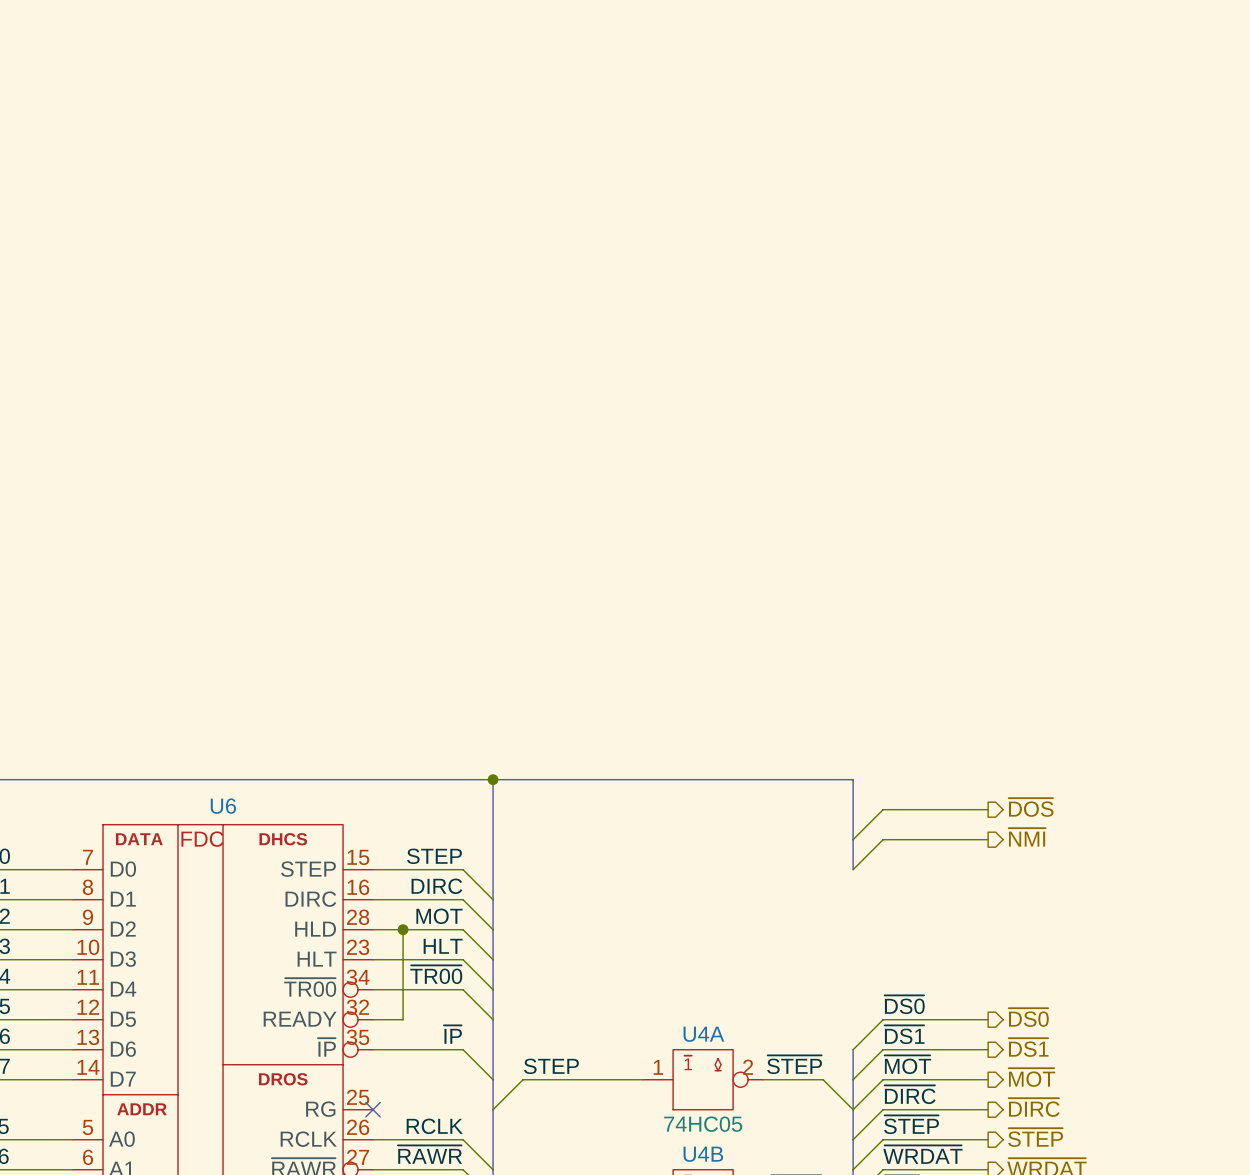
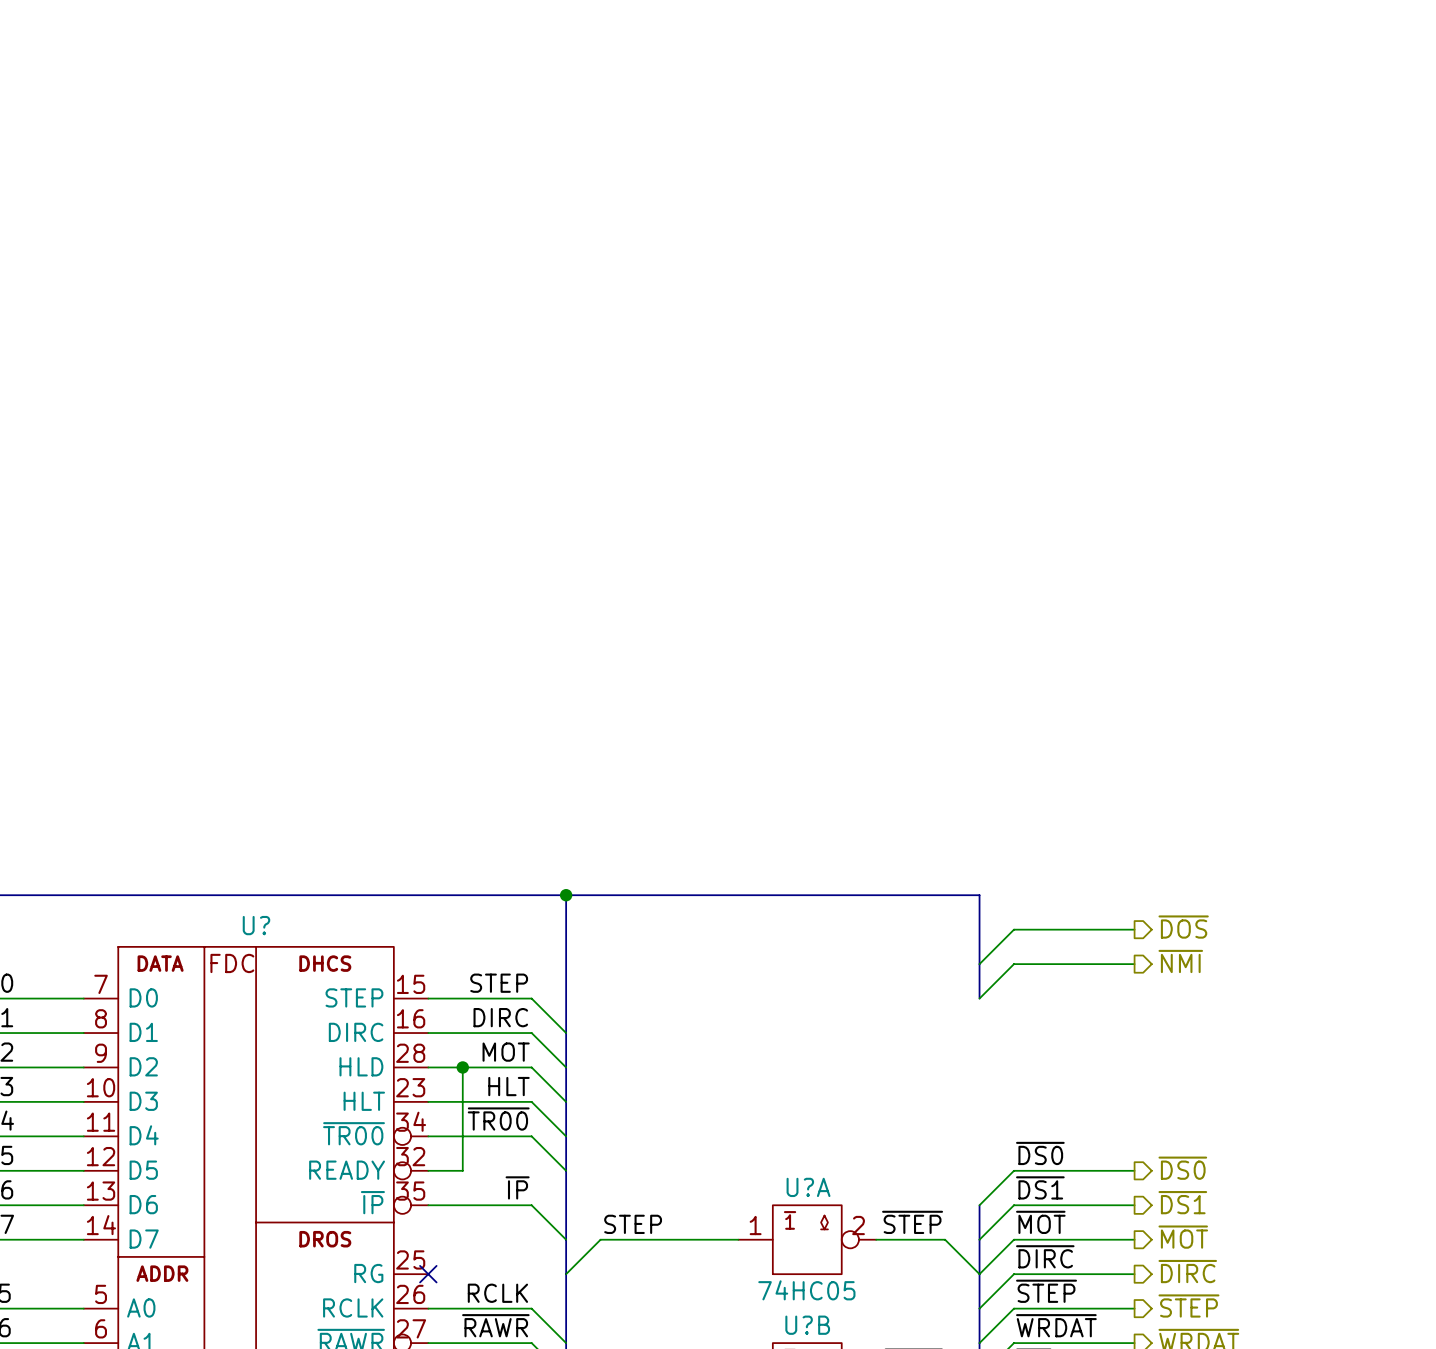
U6 name: U6 (223, 806) -> U? (256, 925)
U4A name: U4A (703, 1034) -> U?A (808, 1187)
U4B name: U4B (703, 1154) -> U?B (807, 1325)

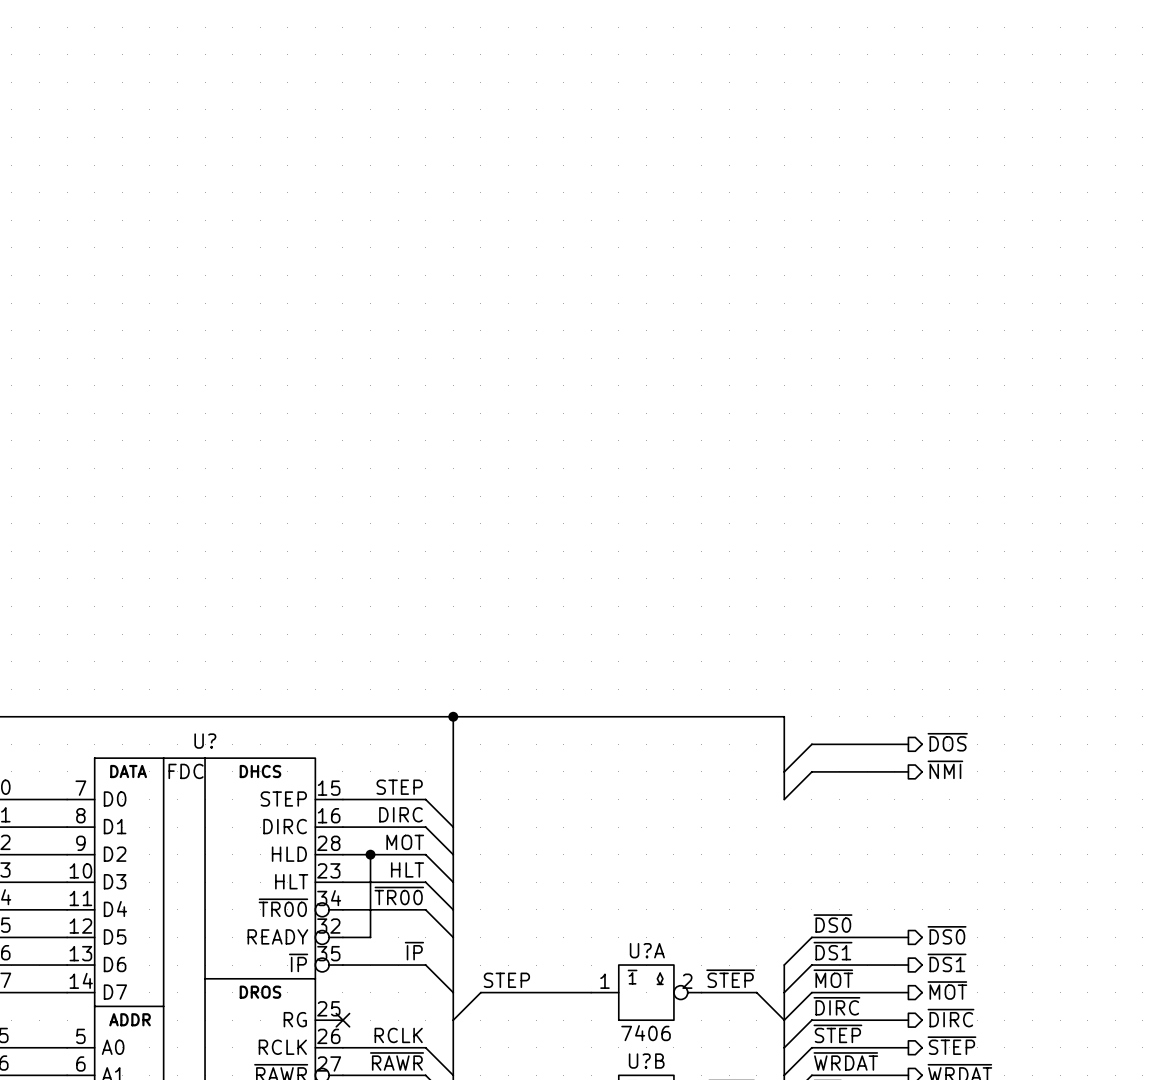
U?A value: 74HC05 (806, 1290) -> 7406 (646, 1033)

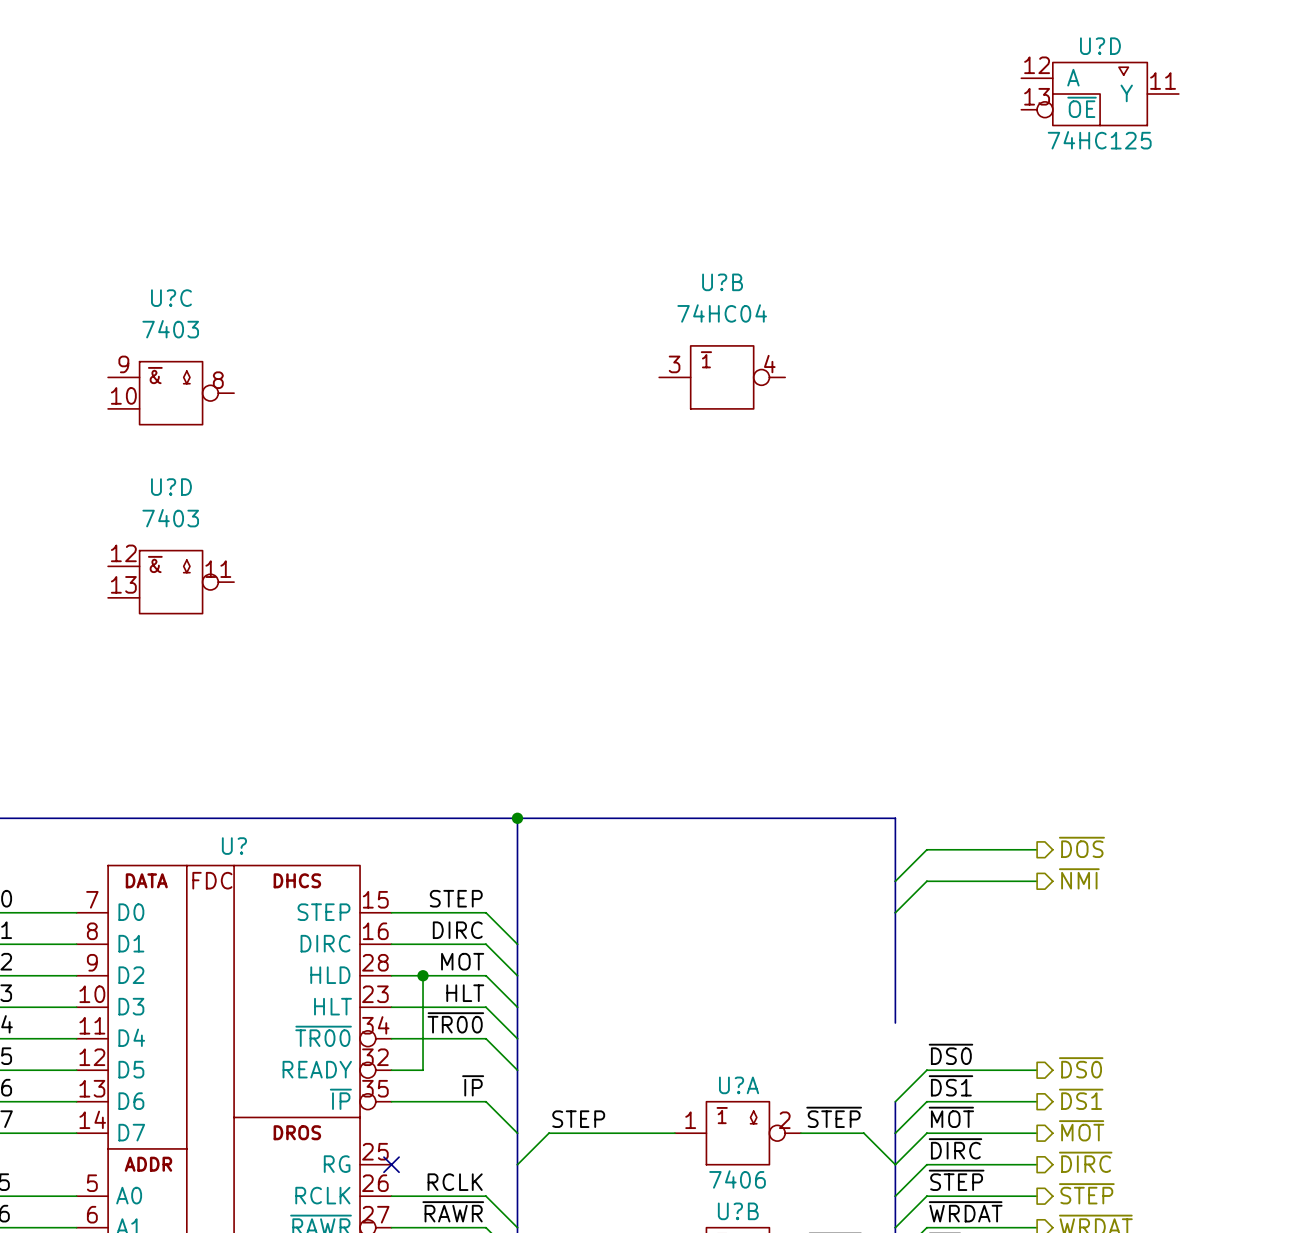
U?D: none -> 74HC125 (1100, 94)
U?B: none -> 74HC04 (722, 377)
U?C: none -> 7403 (171, 393)
U?D: none -> 7403 (171, 582)
bus: none -> (895, 912) (895, 1022)

